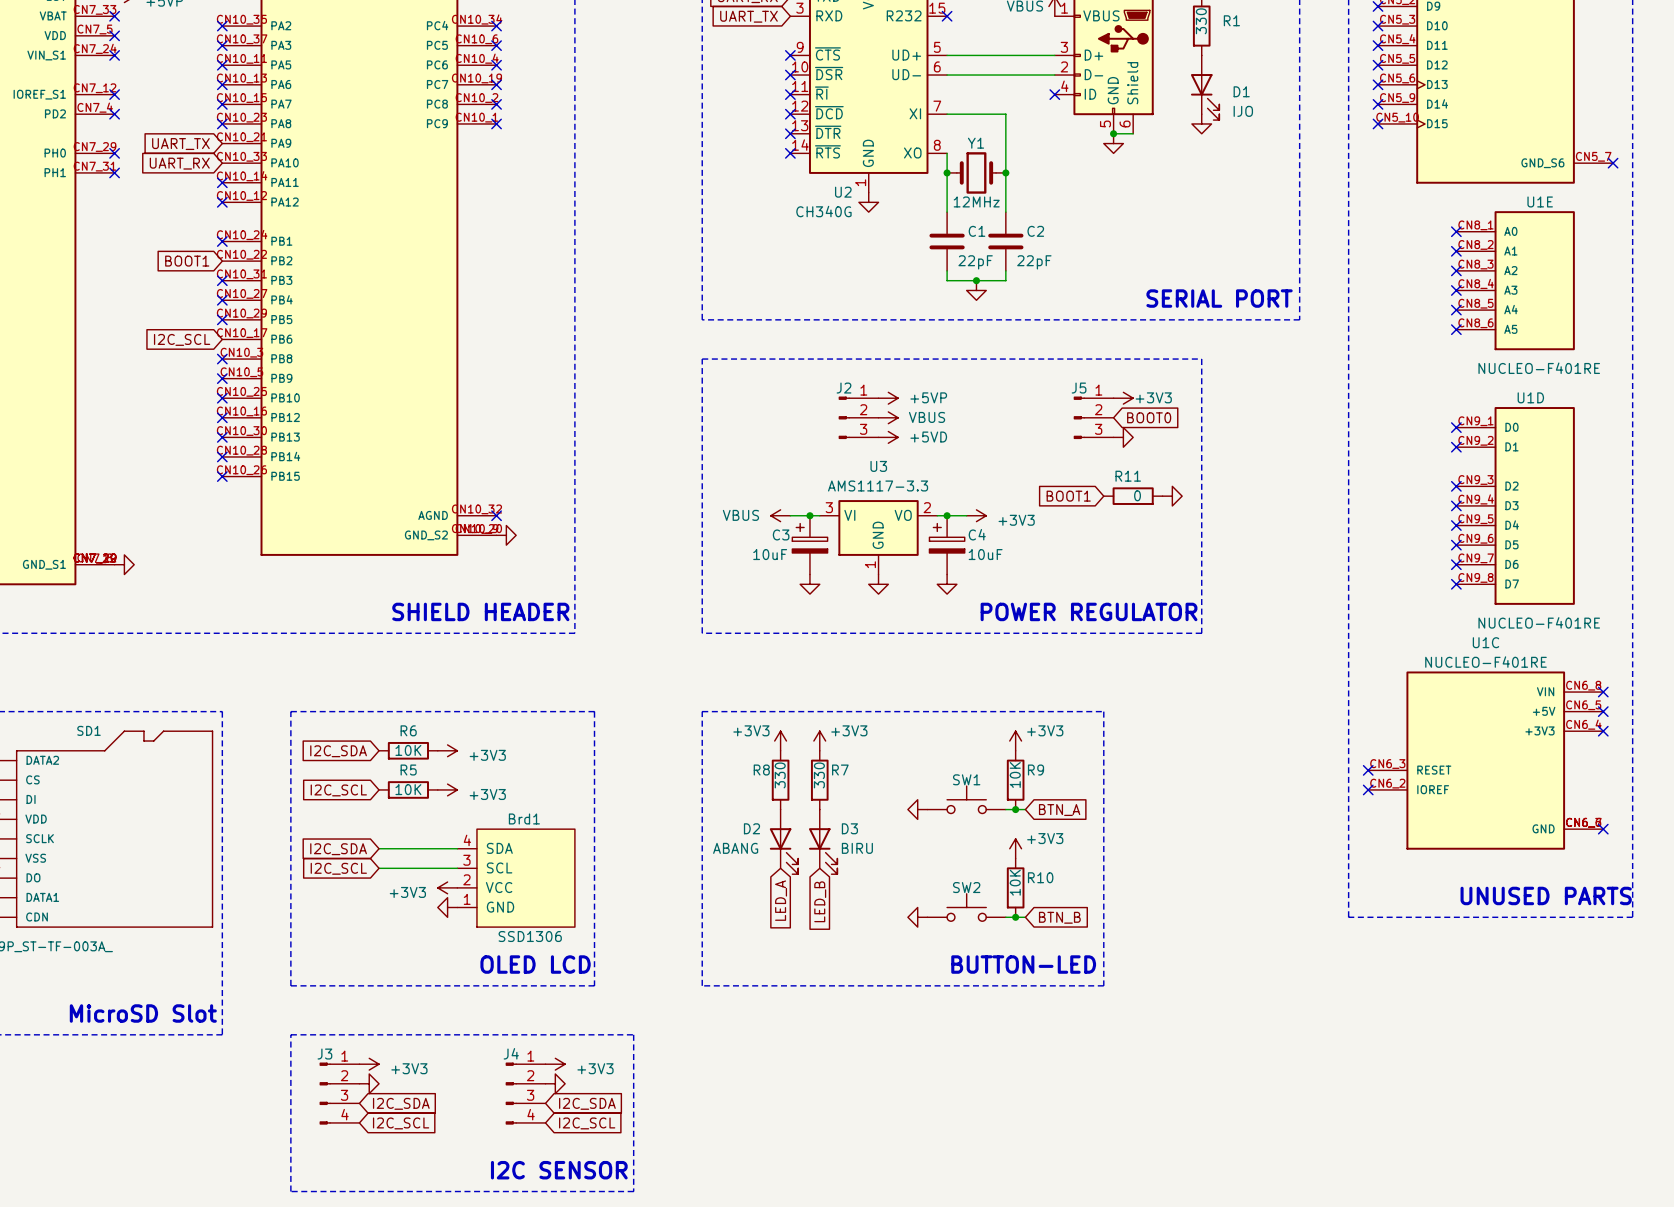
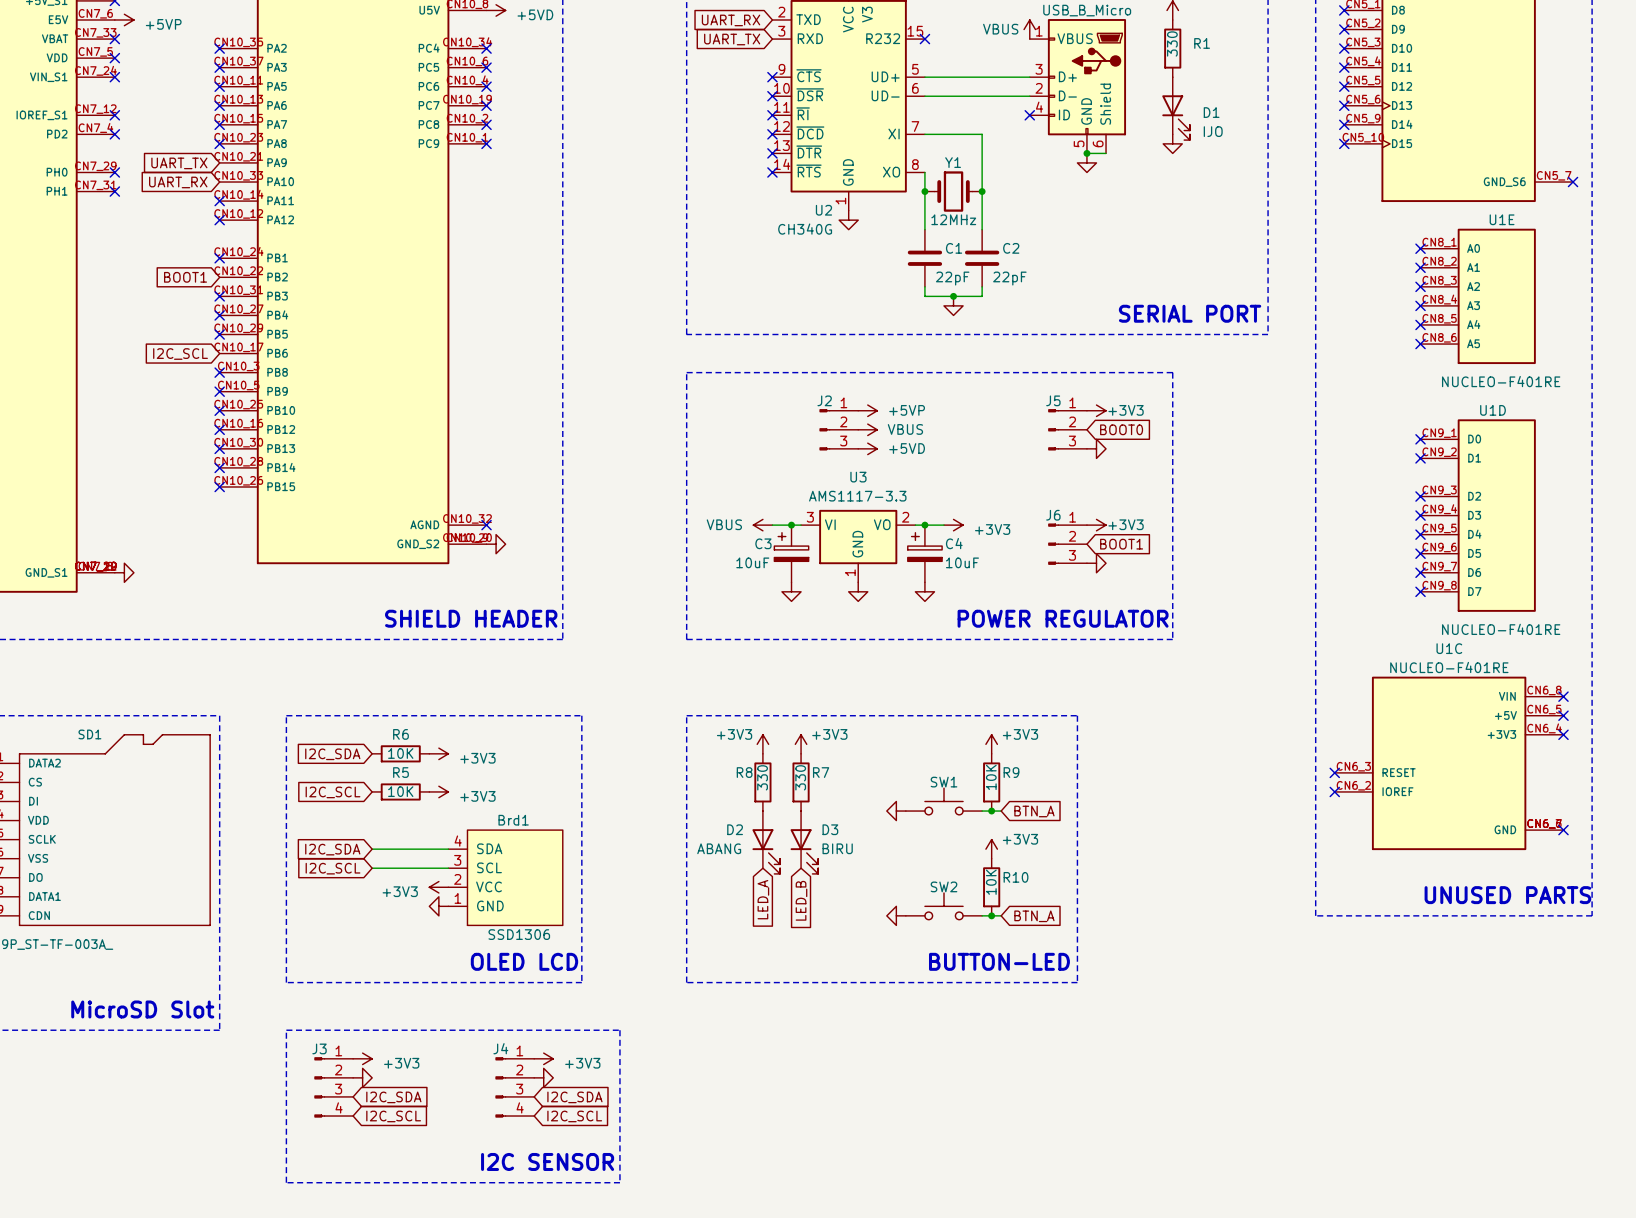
global label rotation: 0° (1068, 496) -> 180° (1121, 544)
global label position: BOOT1 (1068, 496) -> BOOT1 (1121, 544)
R11: 0 (1133, 496) -> none
power symbol position: (1172, 496) -> (1096, 563)
power symbol: none -> +3V3 (1096, 525)
J6: none -> (1067, 544)
global label: BTN_B (1059, 917) -> BTN_A (1034, 916)

